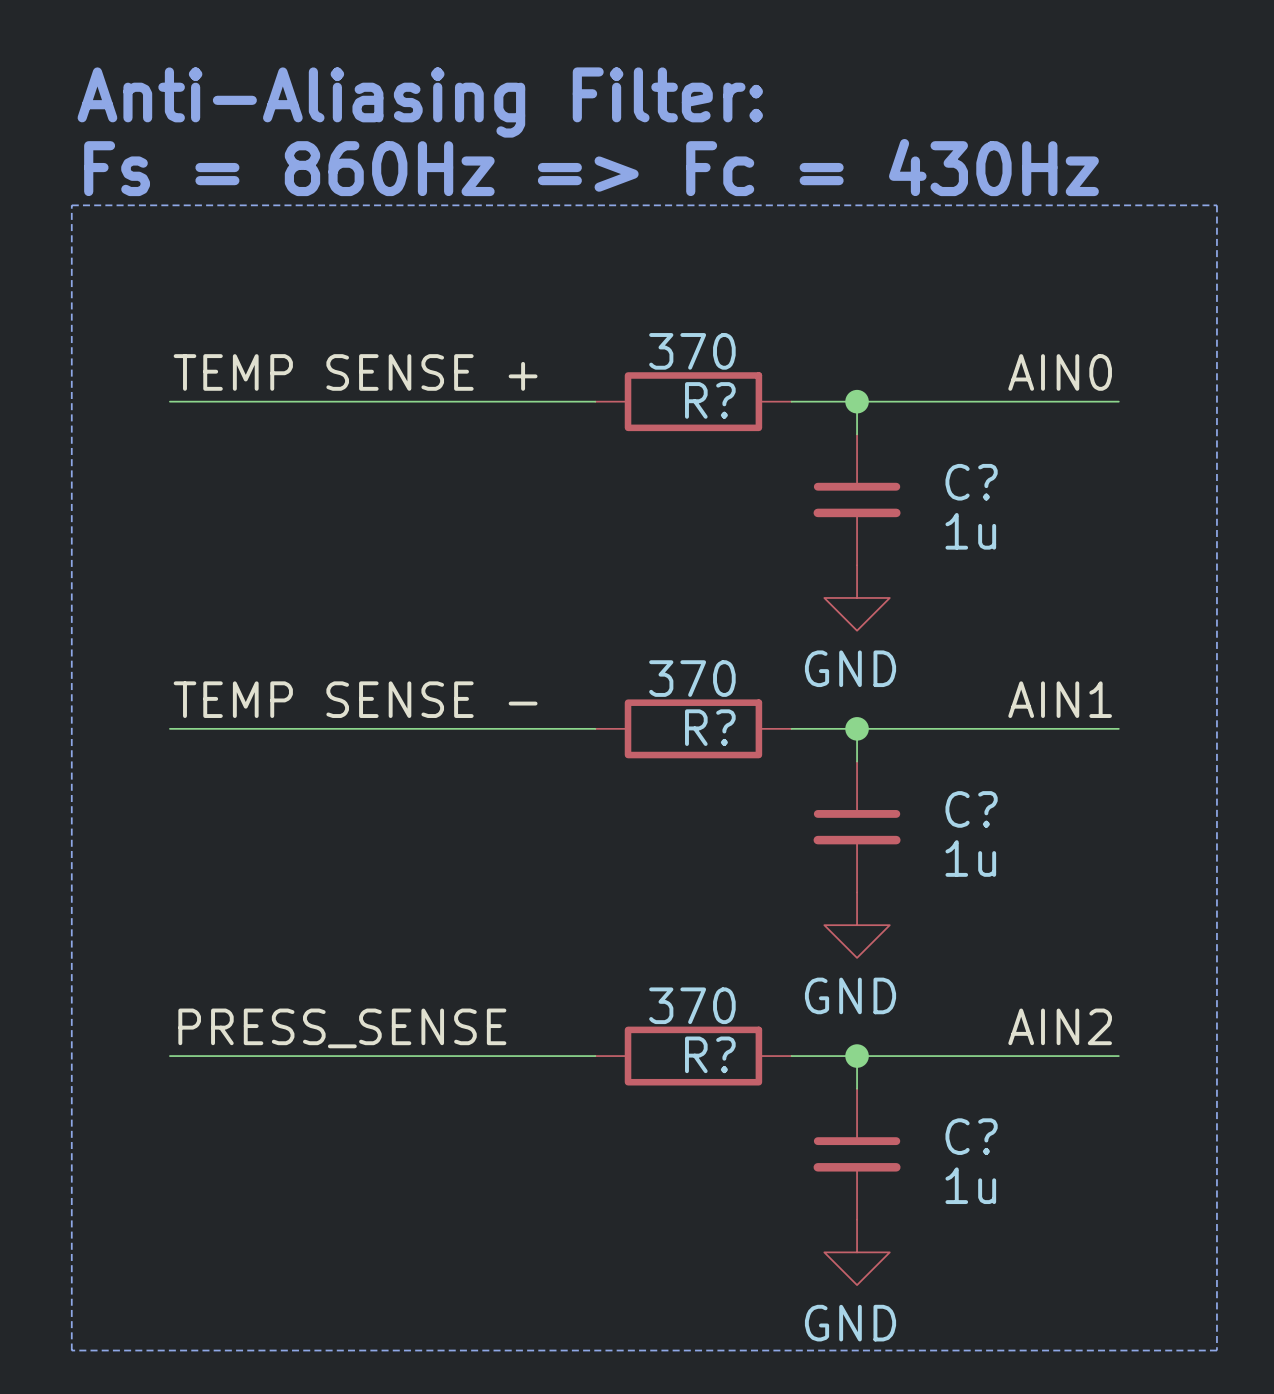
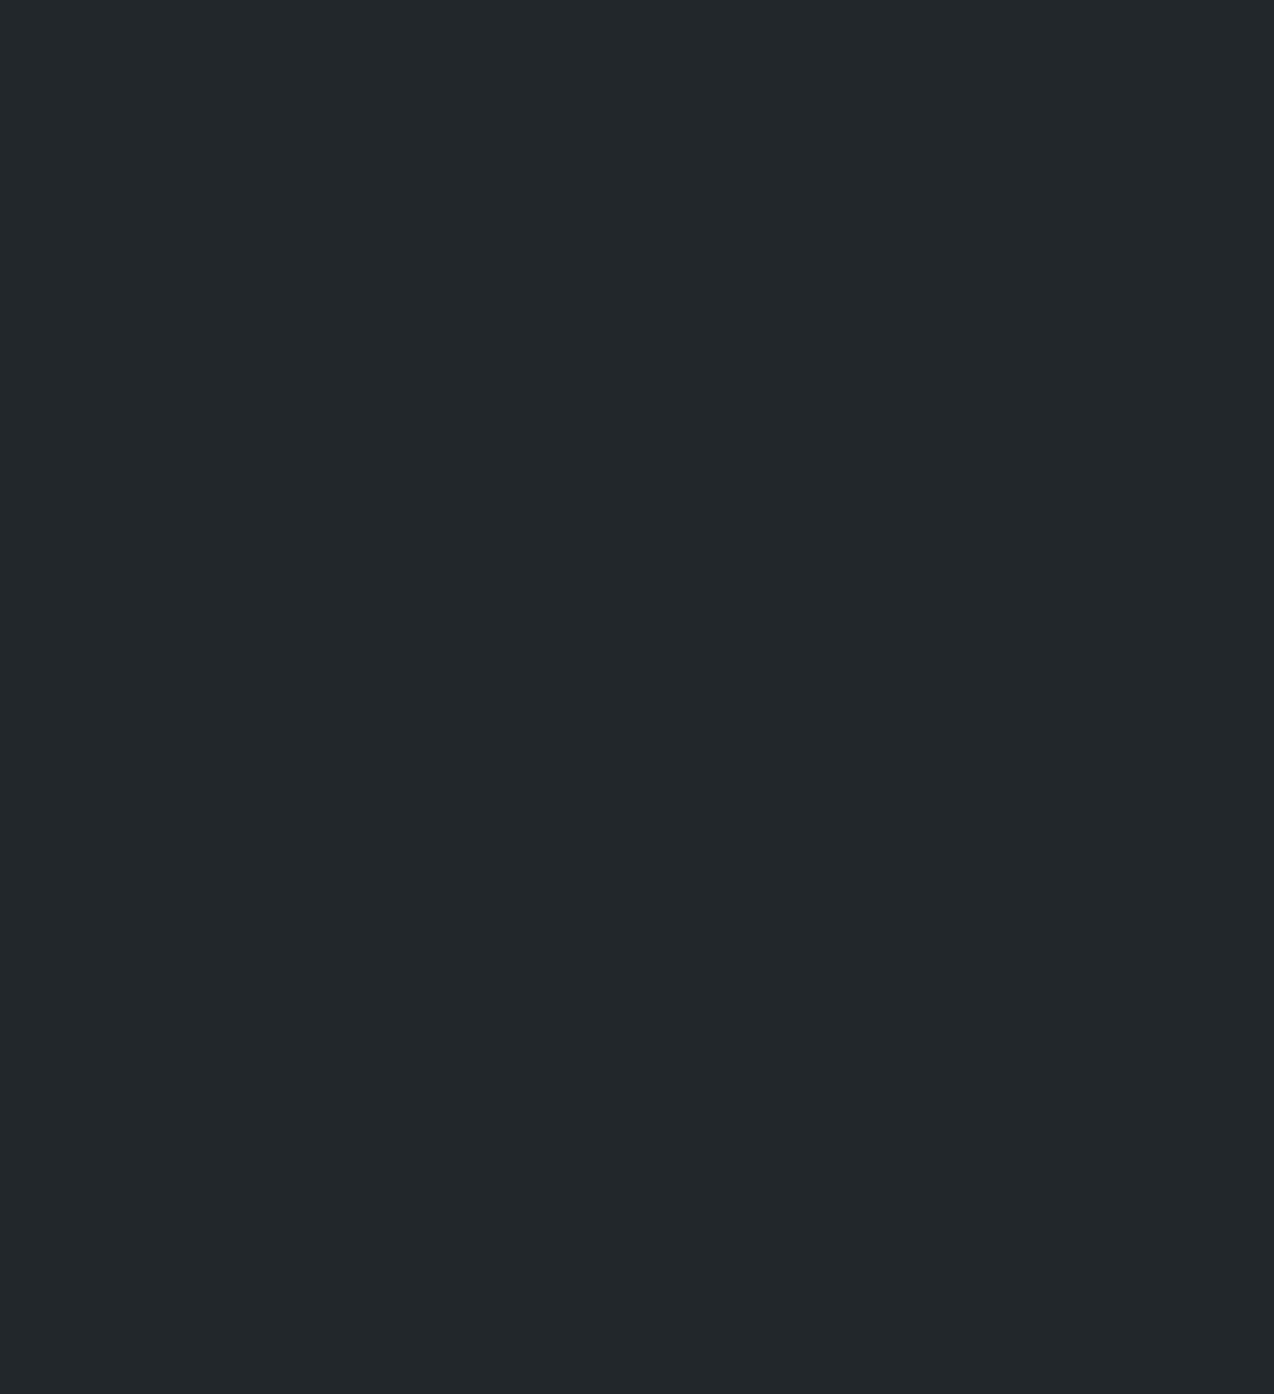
text: Anti-Aliasing Filter: (420, 102) -> none
text: Fs = 860Hz => Fc = 430Hz (591, 167) -> none
line: (71, 205) (1216, 205) (1216, 1350) (71, 1350) (71, 205) -> none
label: TEMP SENSE + (355, 372) -> none
label: AIN0 (1060, 372) -> none
wire: (169, 401) (595, 401) -> none
R?: 370 (693, 401) -> none
wire: (791, 401) (1118, 401) -> none
wire: (857, 401) (857, 434) -> none
junction: (857, 401) -> none
C?: 1u (857, 499) -> none
power symbol: GND (857, 597) -> none
label: TEMP SENSE - (355, 699) -> none
label: AIN1 (1060, 699) -> none
wire: (169, 728) (595, 728) -> none
R?: 370 (693, 728) -> none
wire: (791, 728) (1118, 728) -> none
wire: (857, 728) (857, 761) -> none
junction: (857, 728) -> none
C?: 1u (857, 827) -> none
power symbol: GND (857, 925) -> none
label: AIN2 (1060, 1026) -> none
label: PRESS_SENSE (342, 1028) -> none
wire: (169, 1056) (595, 1056) -> none
R?: 370 (693, 1056) -> none
wire: (791, 1056) (1118, 1056) -> none
wire: (857, 1056) (857, 1088) -> none
junction: (857, 1056) -> none
C?: 1u (857, 1154) -> none
power symbol: GND (857, 1252) -> none

